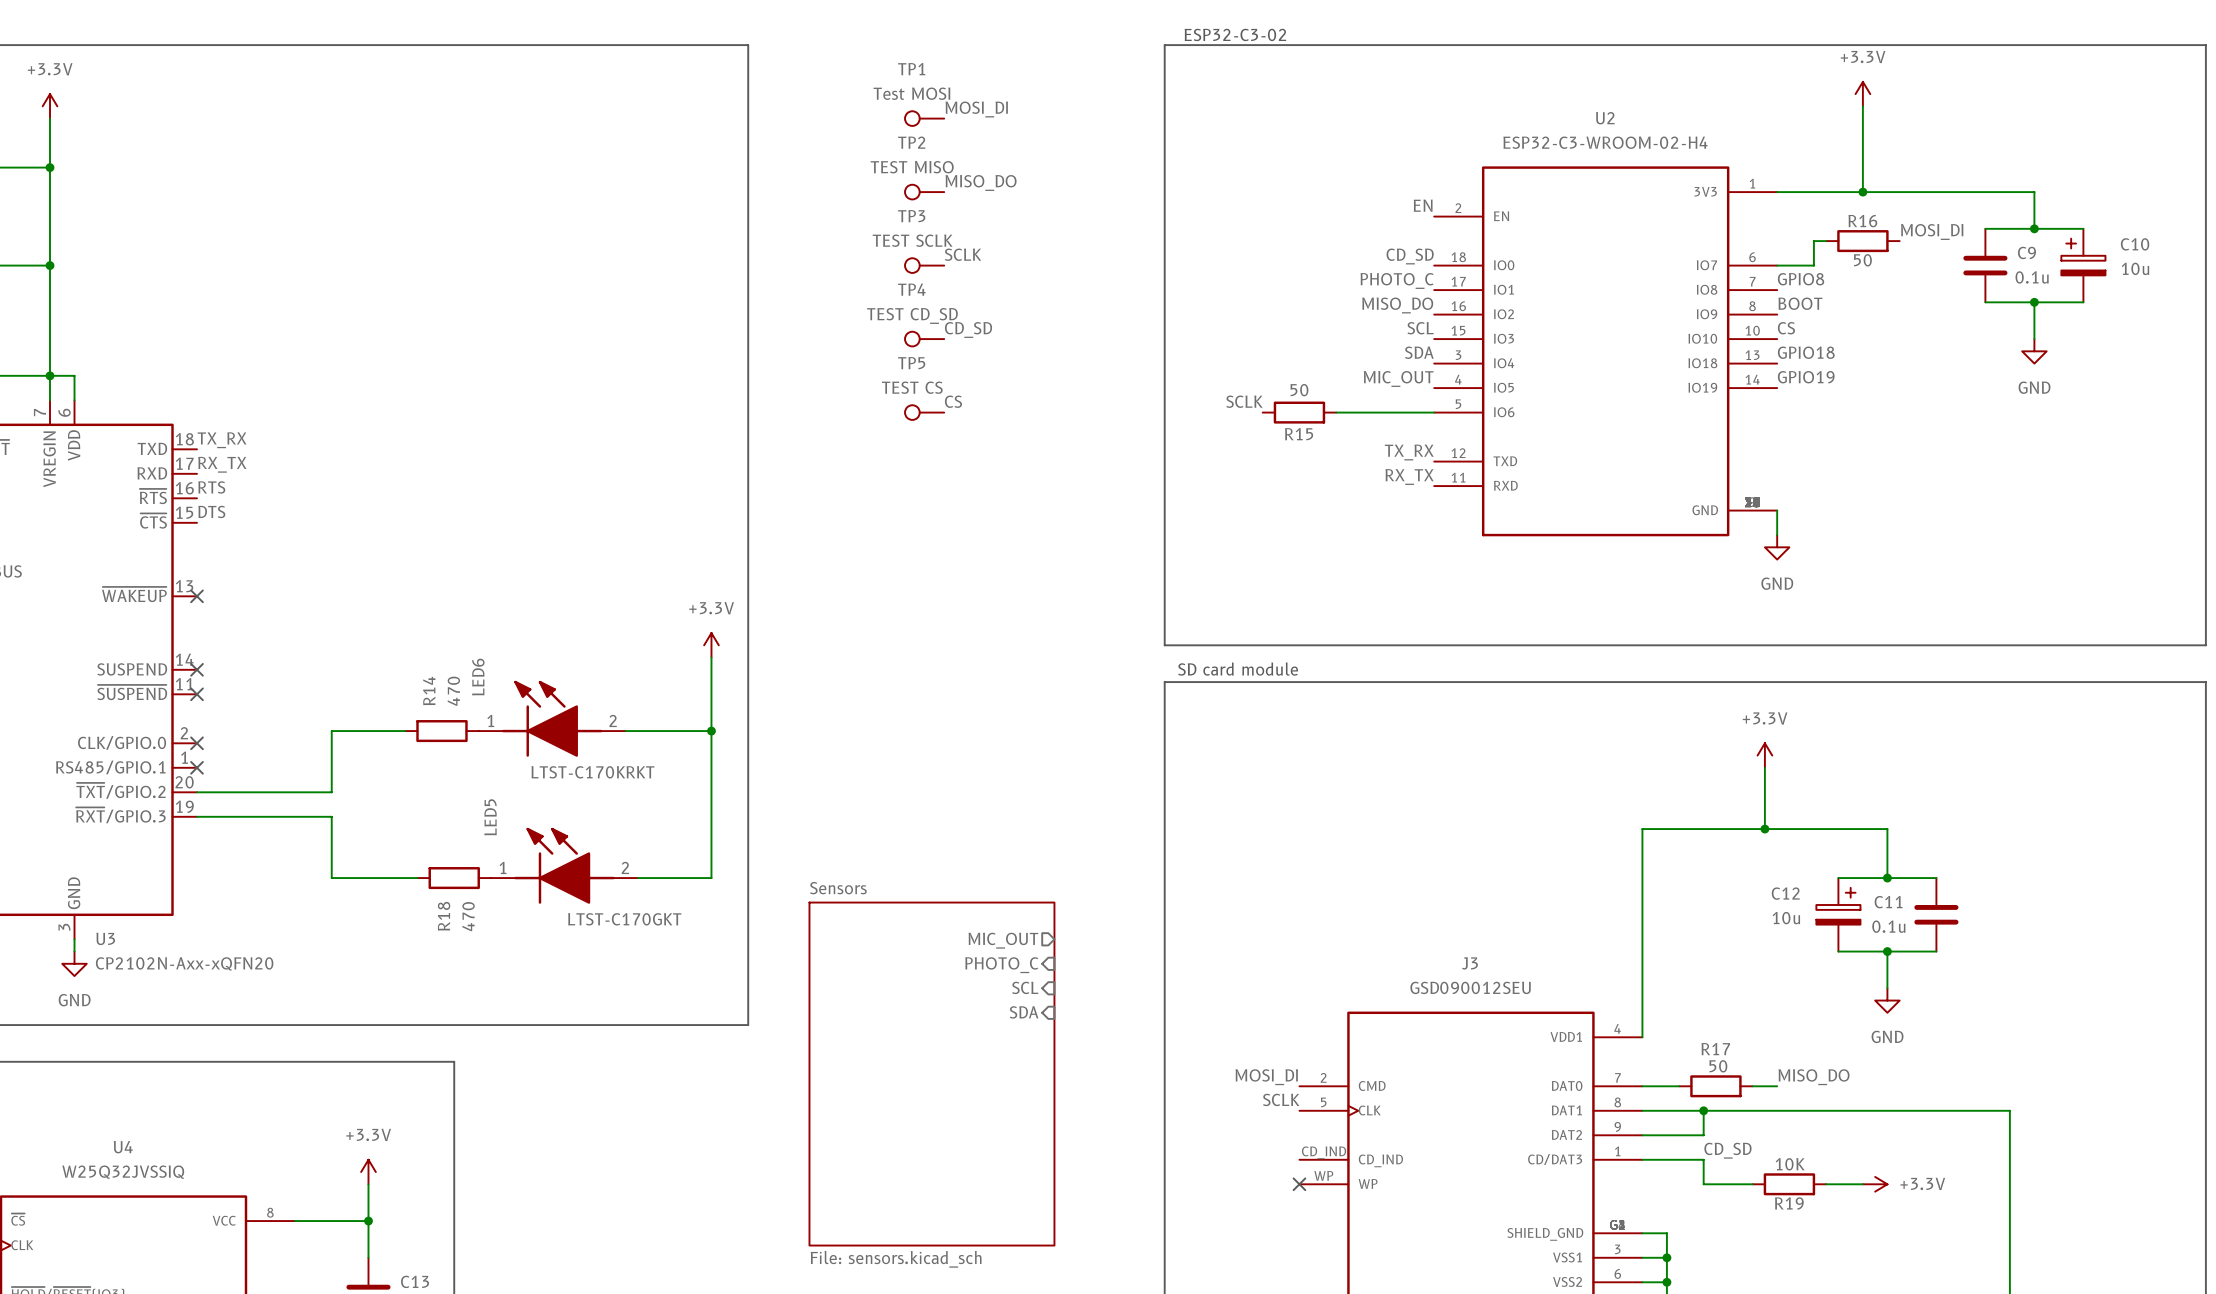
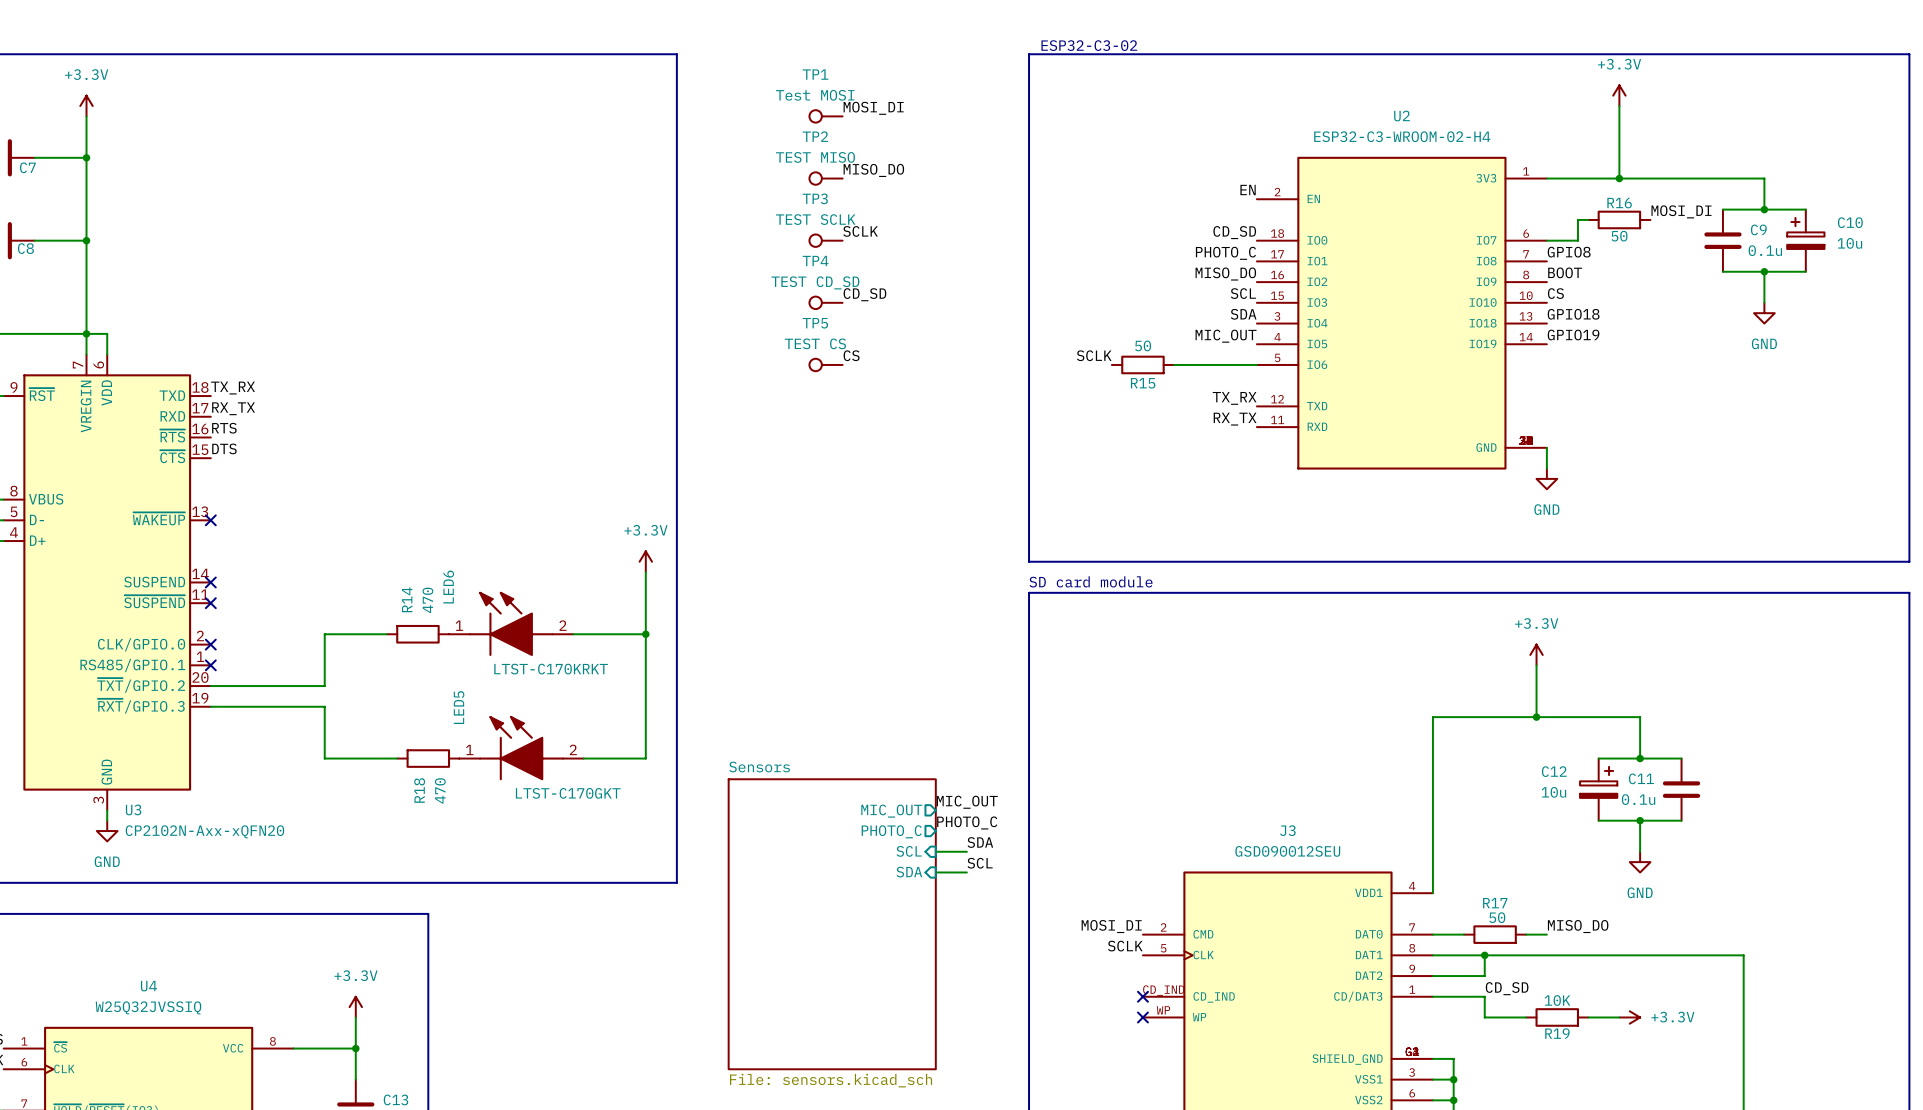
label: none -> MIC_OUT (967, 802)
label: none -> PHOTO_C (967, 822)
sheet pin shape: input (1001, 965) -> output (891, 831)
label: none -> SDA (980, 842)
wire: none -> (935, 851) (966, 851)
label: none -> SCL (980, 863)
wire: none -> (935, 872) (966, 872)
no-connect mark: none -> (1142, 996)

